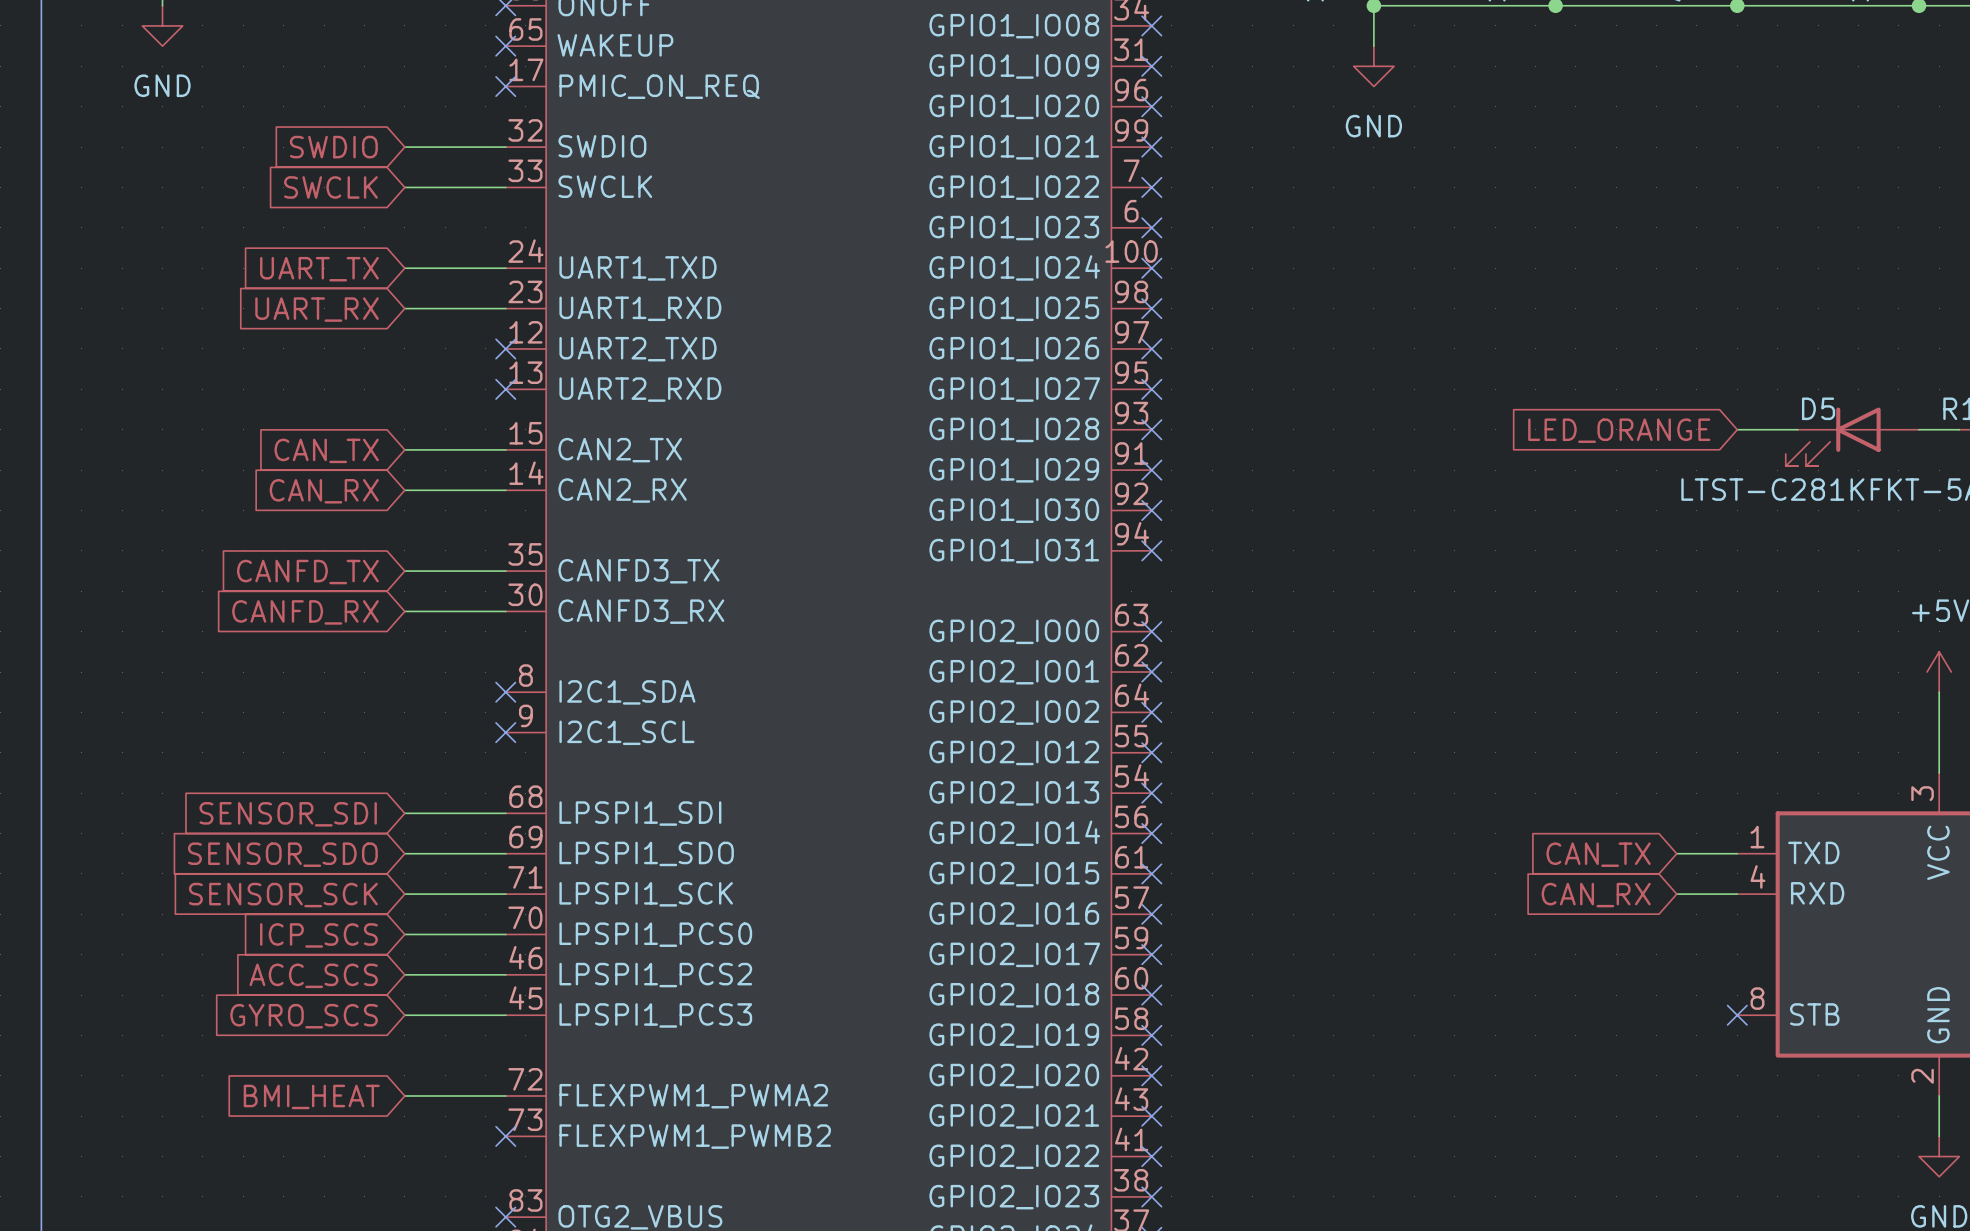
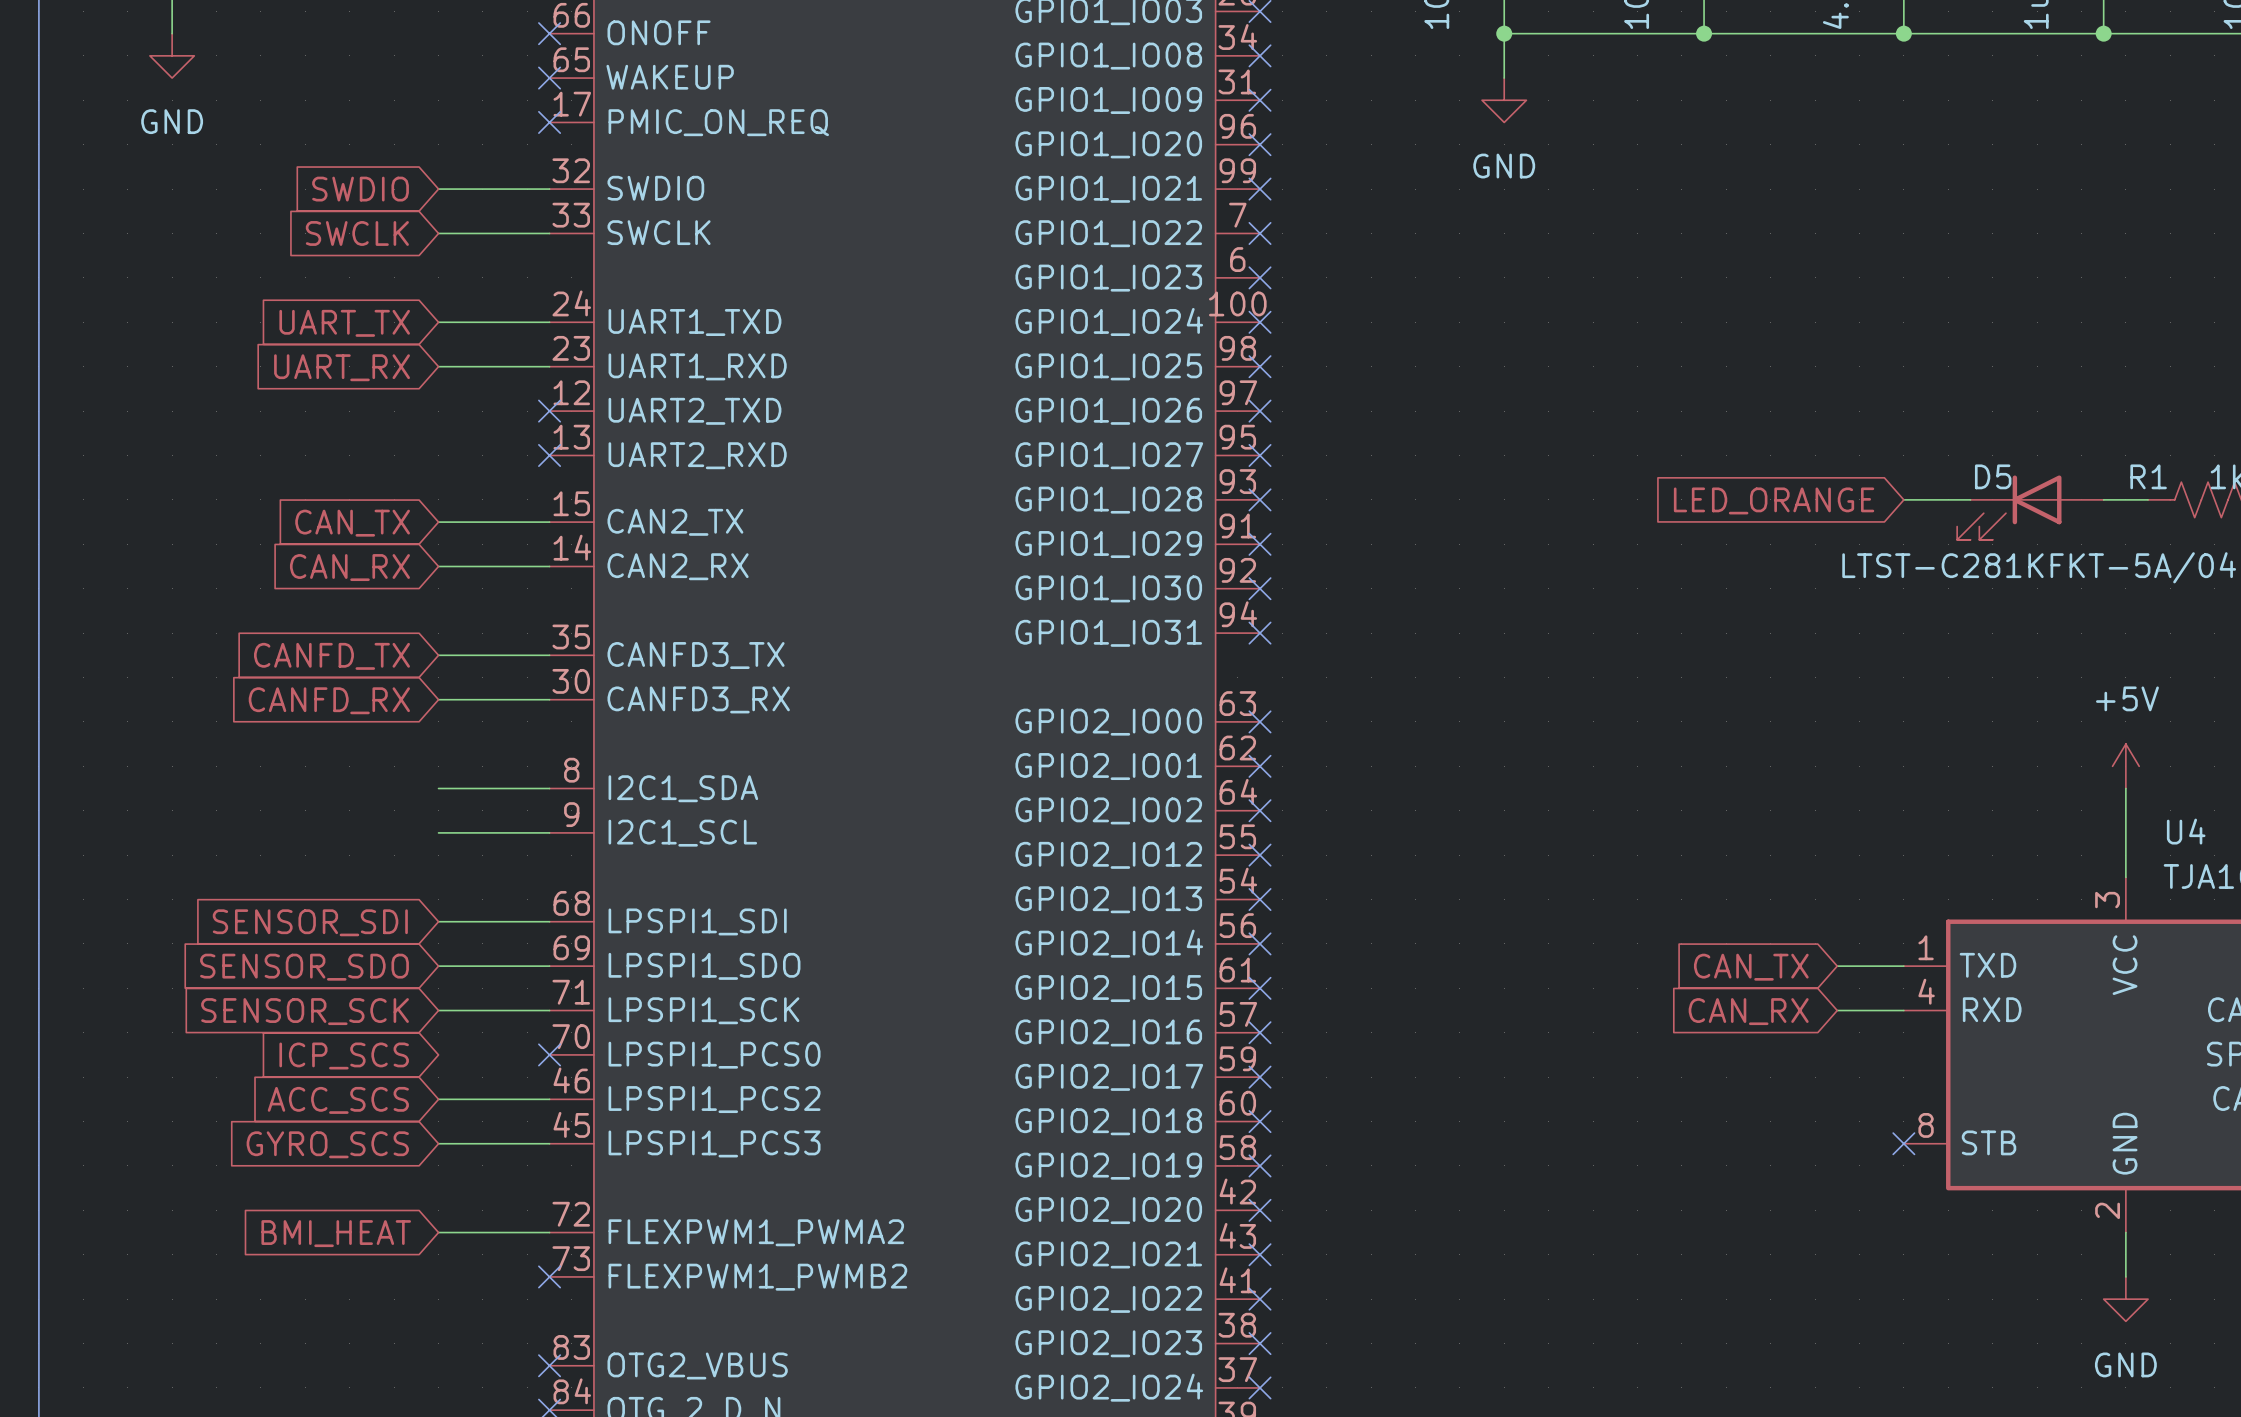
wire: none -> (438, 788) (549, 788)
no-connect mark: (505, 692) -> none
no-connect mark: (505, 732) -> none
wire: (404, 934) (505, 934) -> (438, 832) (549, 832)
no-connect mark: none -> (549, 1054)

